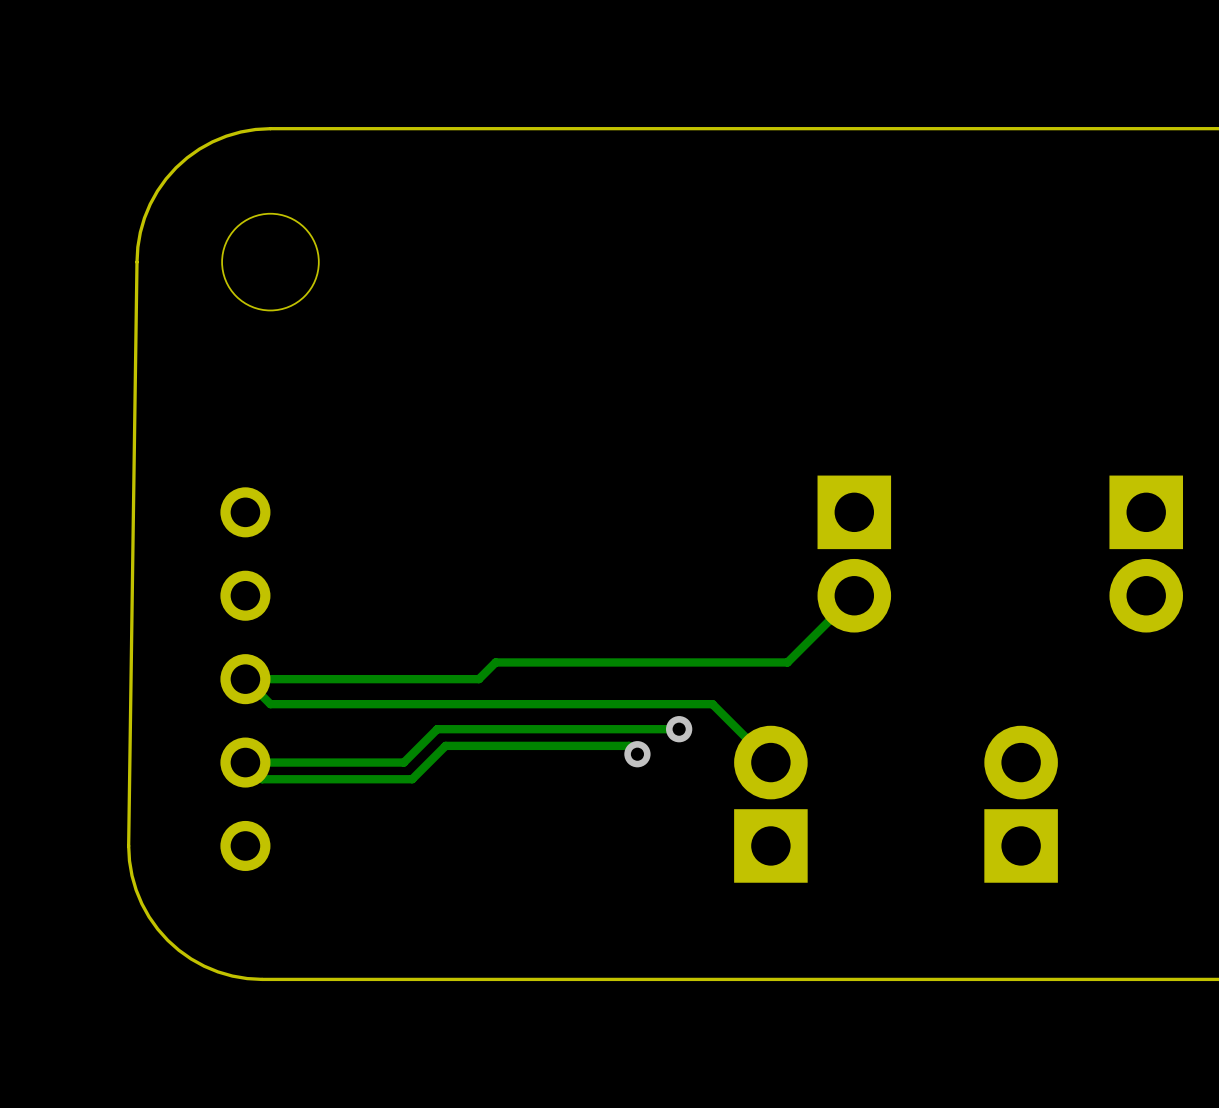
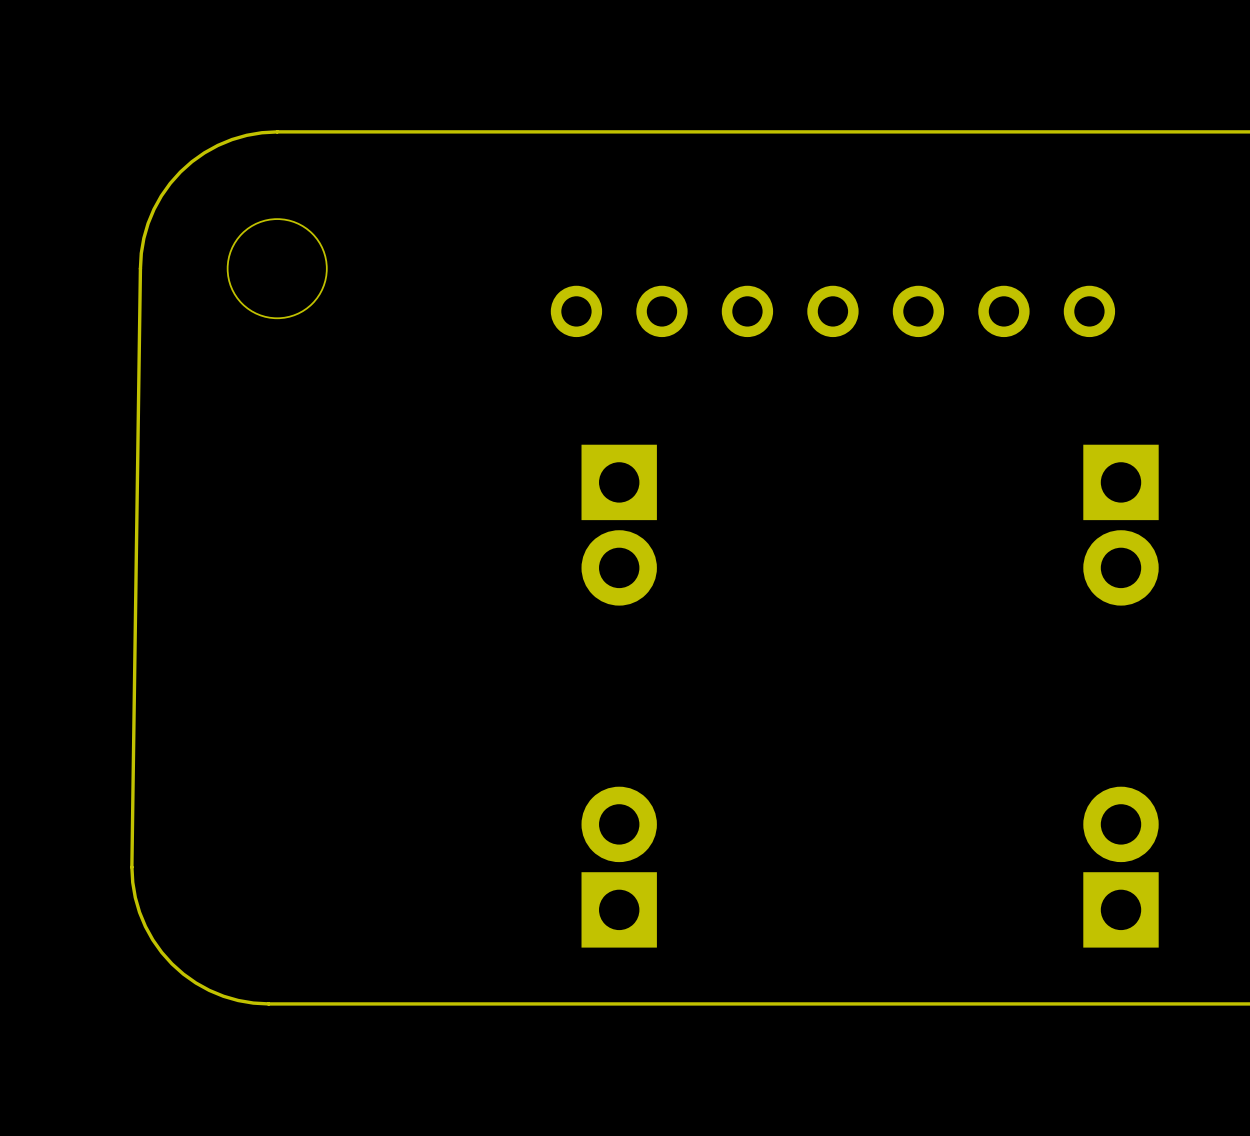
part: none -> (832, 311)
part: none -> (619, 525)
part: (854, 554) -> none
part position: (1146, 554) -> (1120, 525)
track: (854, 595) (787, 662) (495, 662) (478, 679) (245, 679) (270, 704) (712, 704) (770, 762) -> none
part: (245, 679) -> none
track: (679, 729) (437, 729) (403, 762) (245, 762) (262, 779) (412, 779) (445, 745) (629, 745) (637, 754) -> none
via: (679, 729) -> none
via: (637, 754) -> none
part: (770, 804) -> none
part position: (1021, 804) -> (1120, 867)
part: none -> (619, 867)

